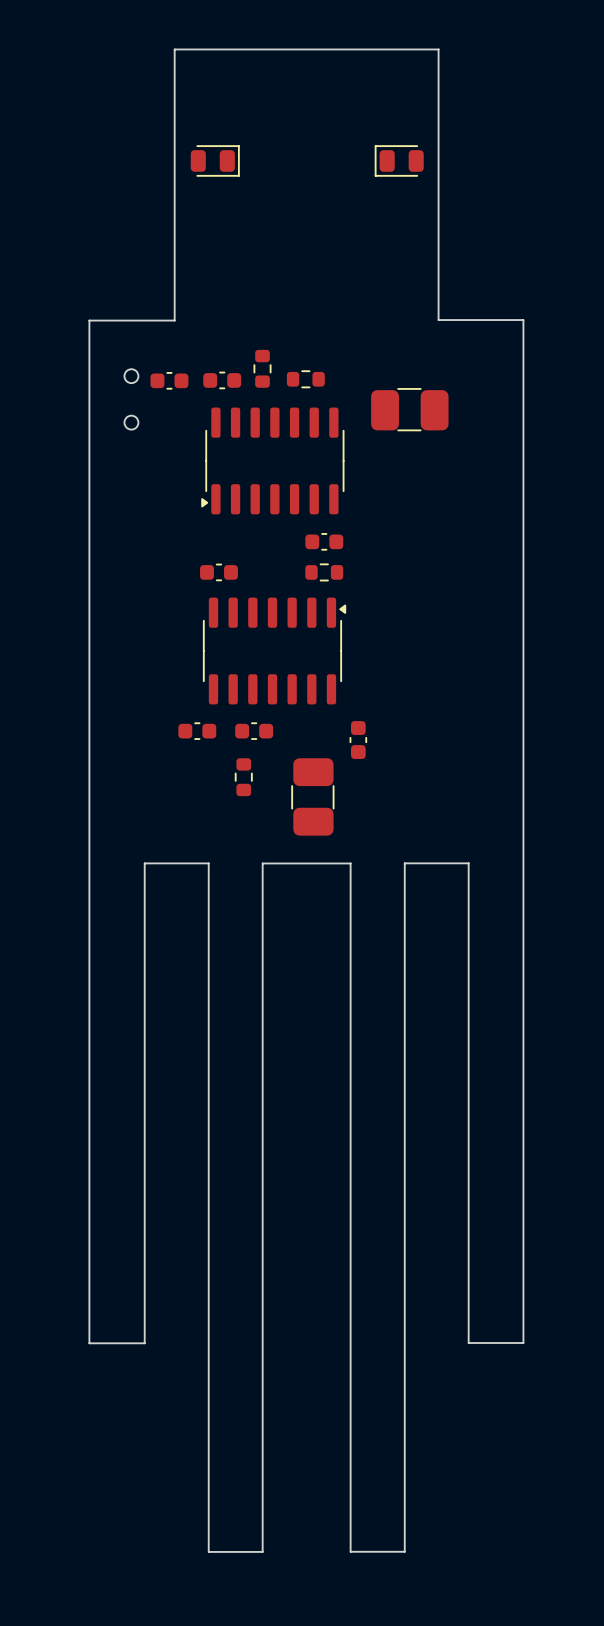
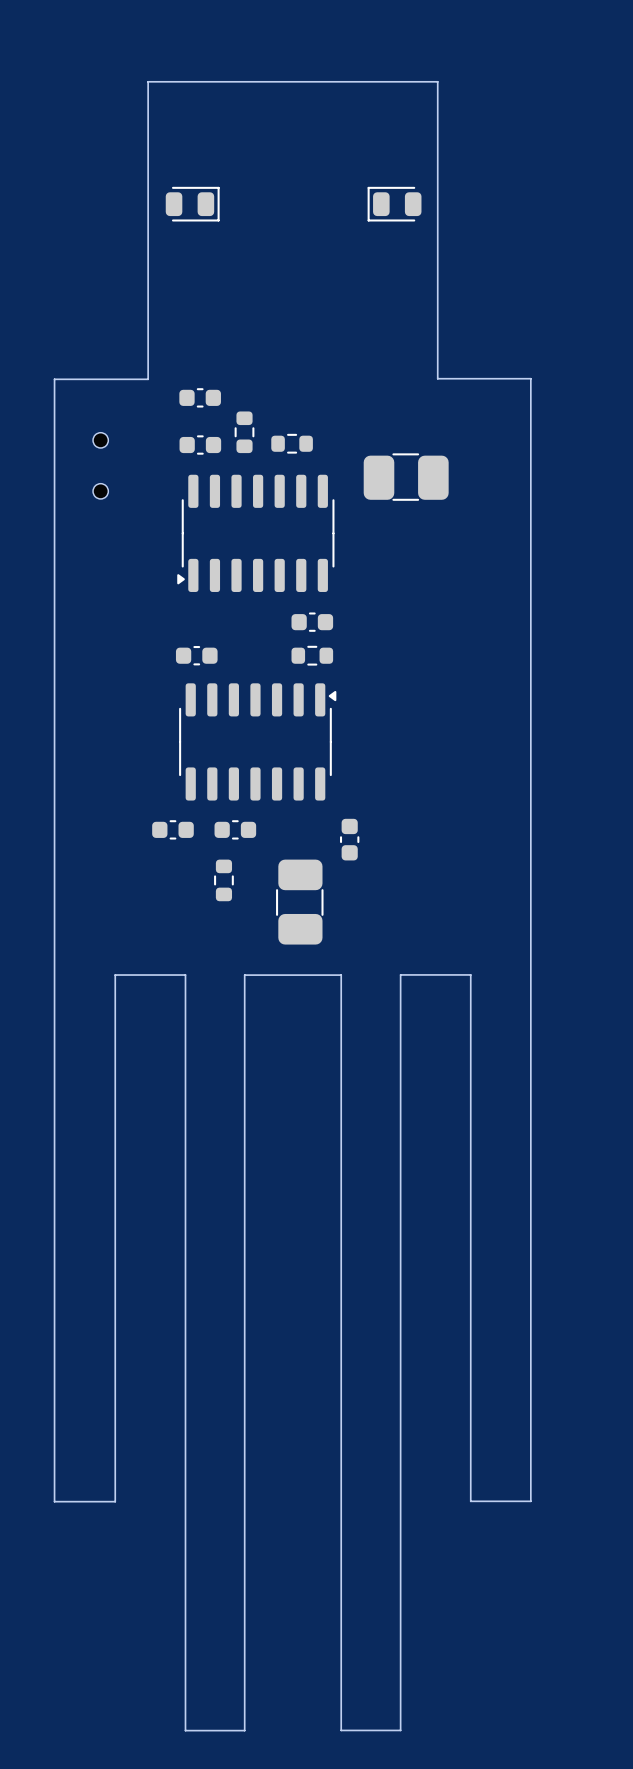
part position: (169, 380) -> (200, 397)

